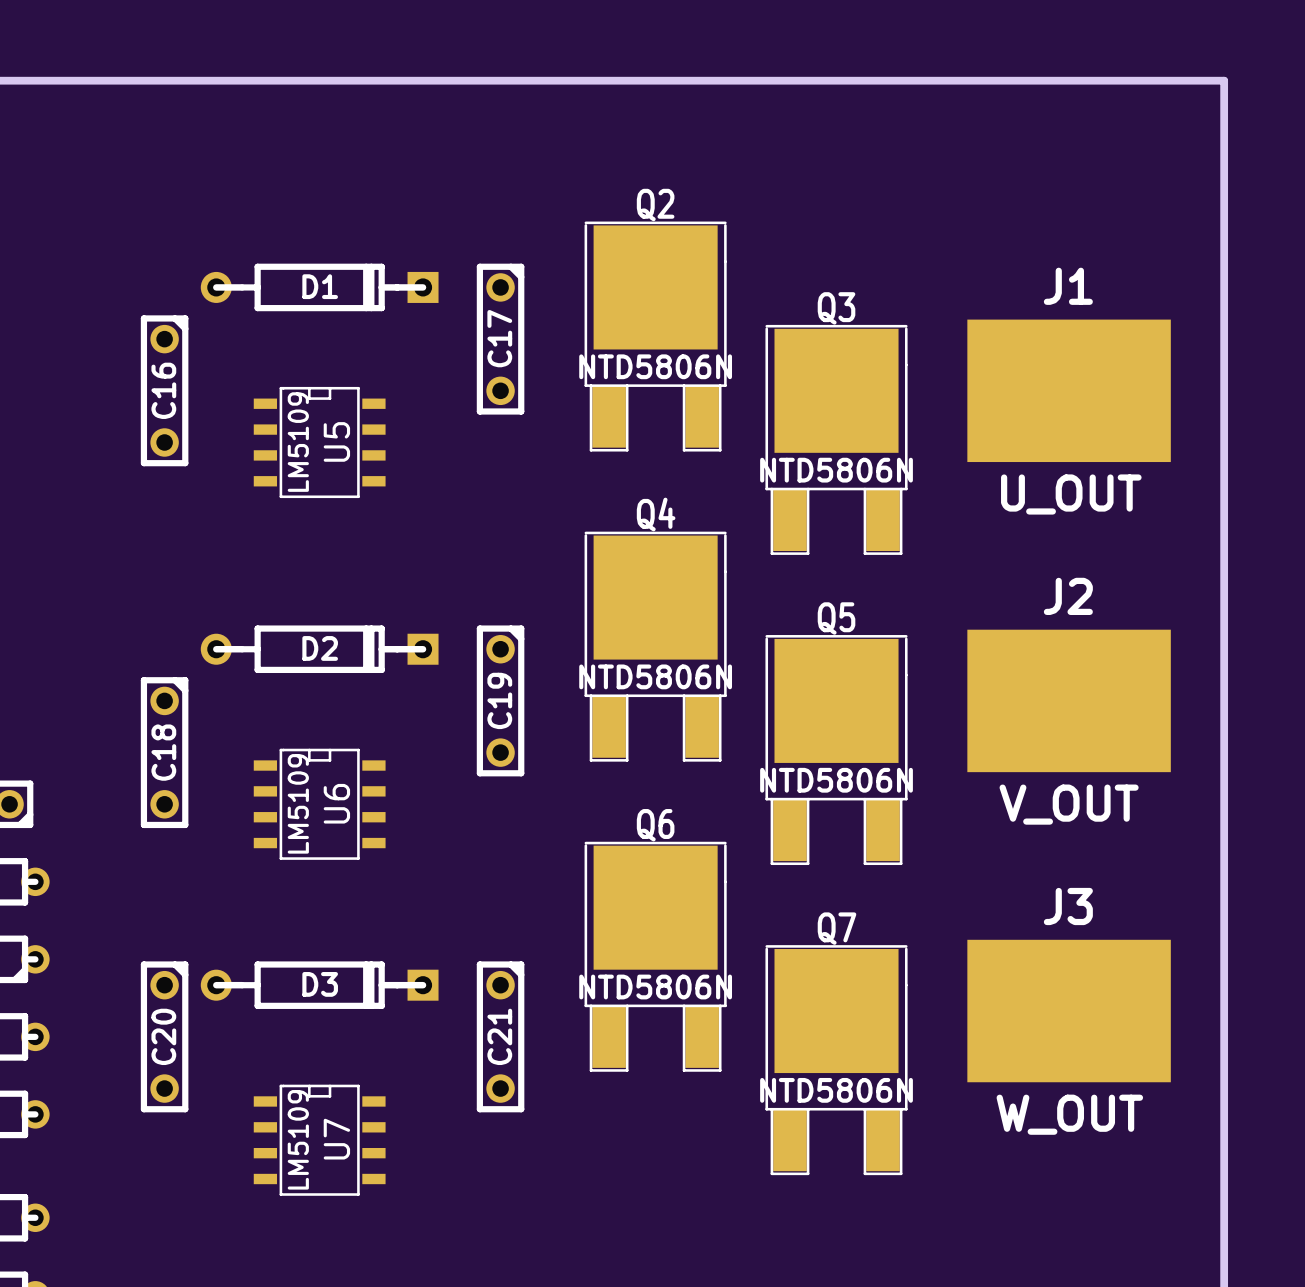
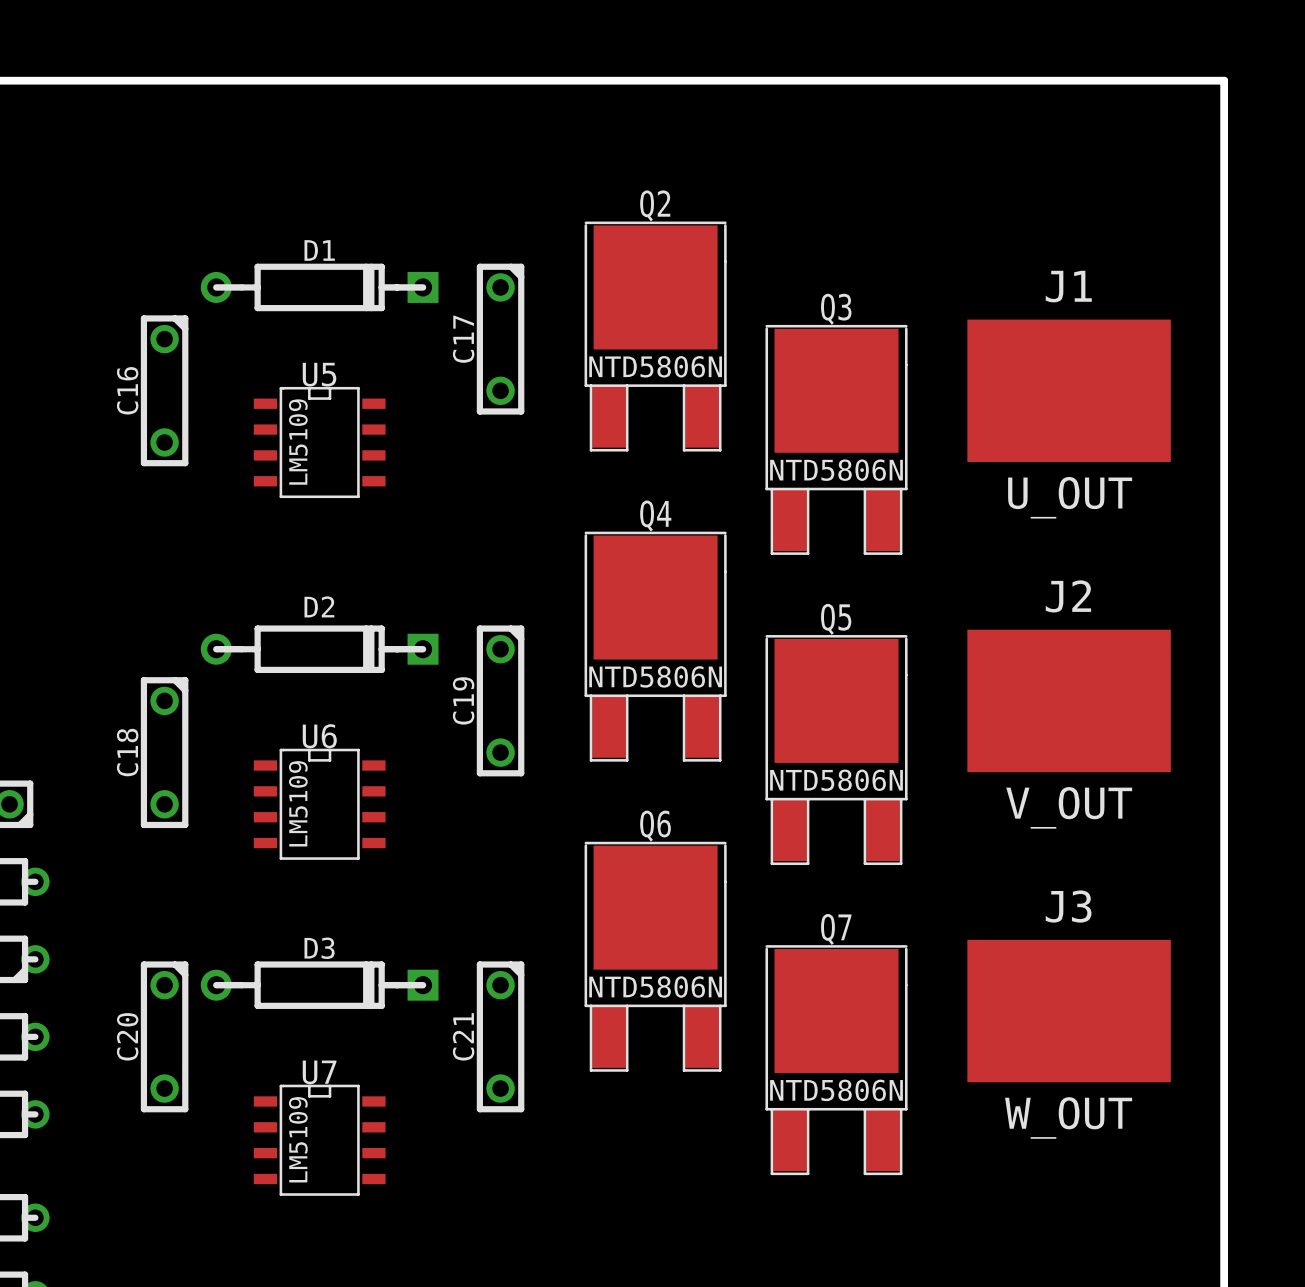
D1 name position: D1 (320, 286) -> D1 (319, 250)
C17 name position: C17 (499, 338) -> C17 (463, 339)
C16 name position: C16 (163, 390) -> C16 (127, 390)
U5 name rotation: 0° (336, 441) -> 90° clockwise (319, 374)
U5 name position: U5 (336, 441) -> U5 (319, 374)
D2 name position: D2 (320, 648) -> D2 (319, 606)
C19 name position: C19 (499, 700) -> C19 (463, 700)
C18 name position: C18 (163, 752) -> C18 (127, 752)
U6 name rotation: 0° (336, 803) -> 90° clockwise (319, 736)
U6 name position: U6 (336, 803) -> U6 (319, 736)
D3 name position: D3 (320, 984) -> D3 (319, 948)
C20 name position: C20 (163, 1036) -> C20 (127, 1036)
C21 name position: C21 (499, 1036) -> C21 (463, 1036)
U7 name rotation: 0° (336, 1139) -> 90° clockwise (319, 1072)
U7 name position: U7 (336, 1139) -> U7 (319, 1072)

